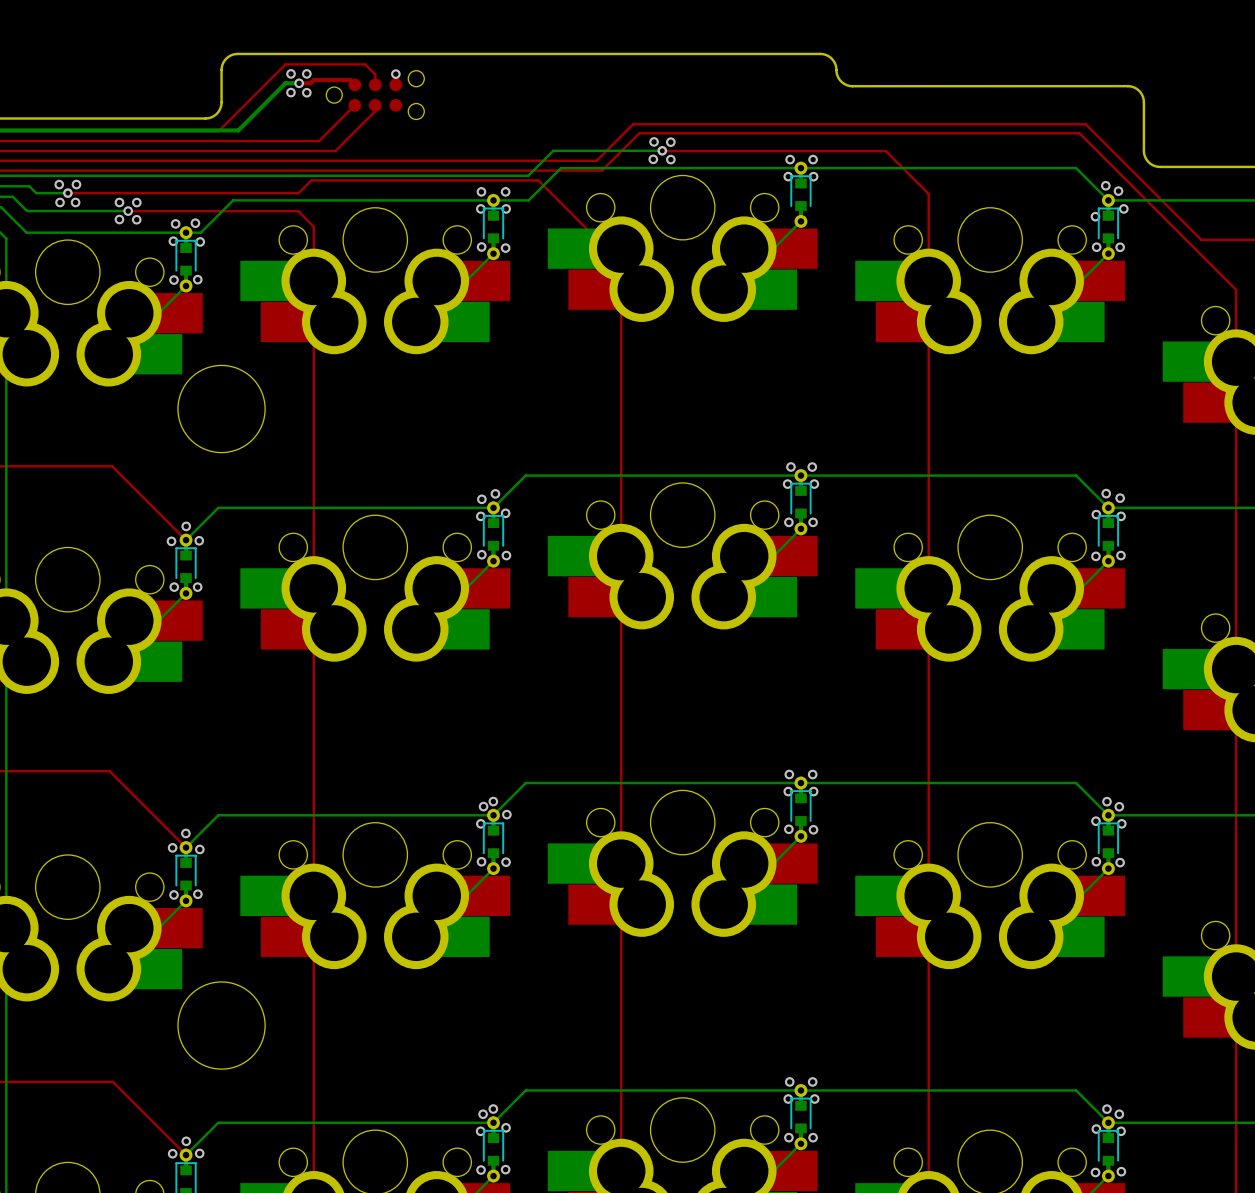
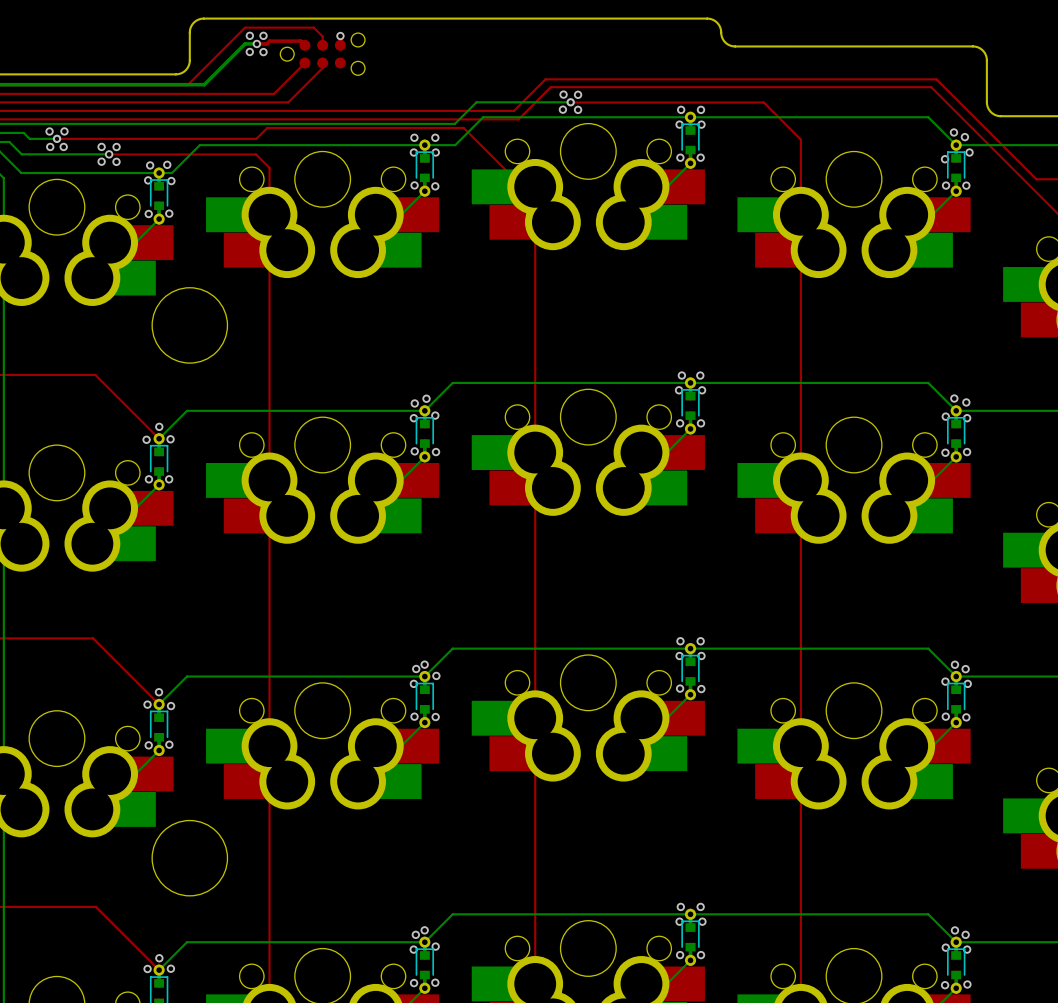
via: none -> (680, 157)
via: none -> (700, 157)

